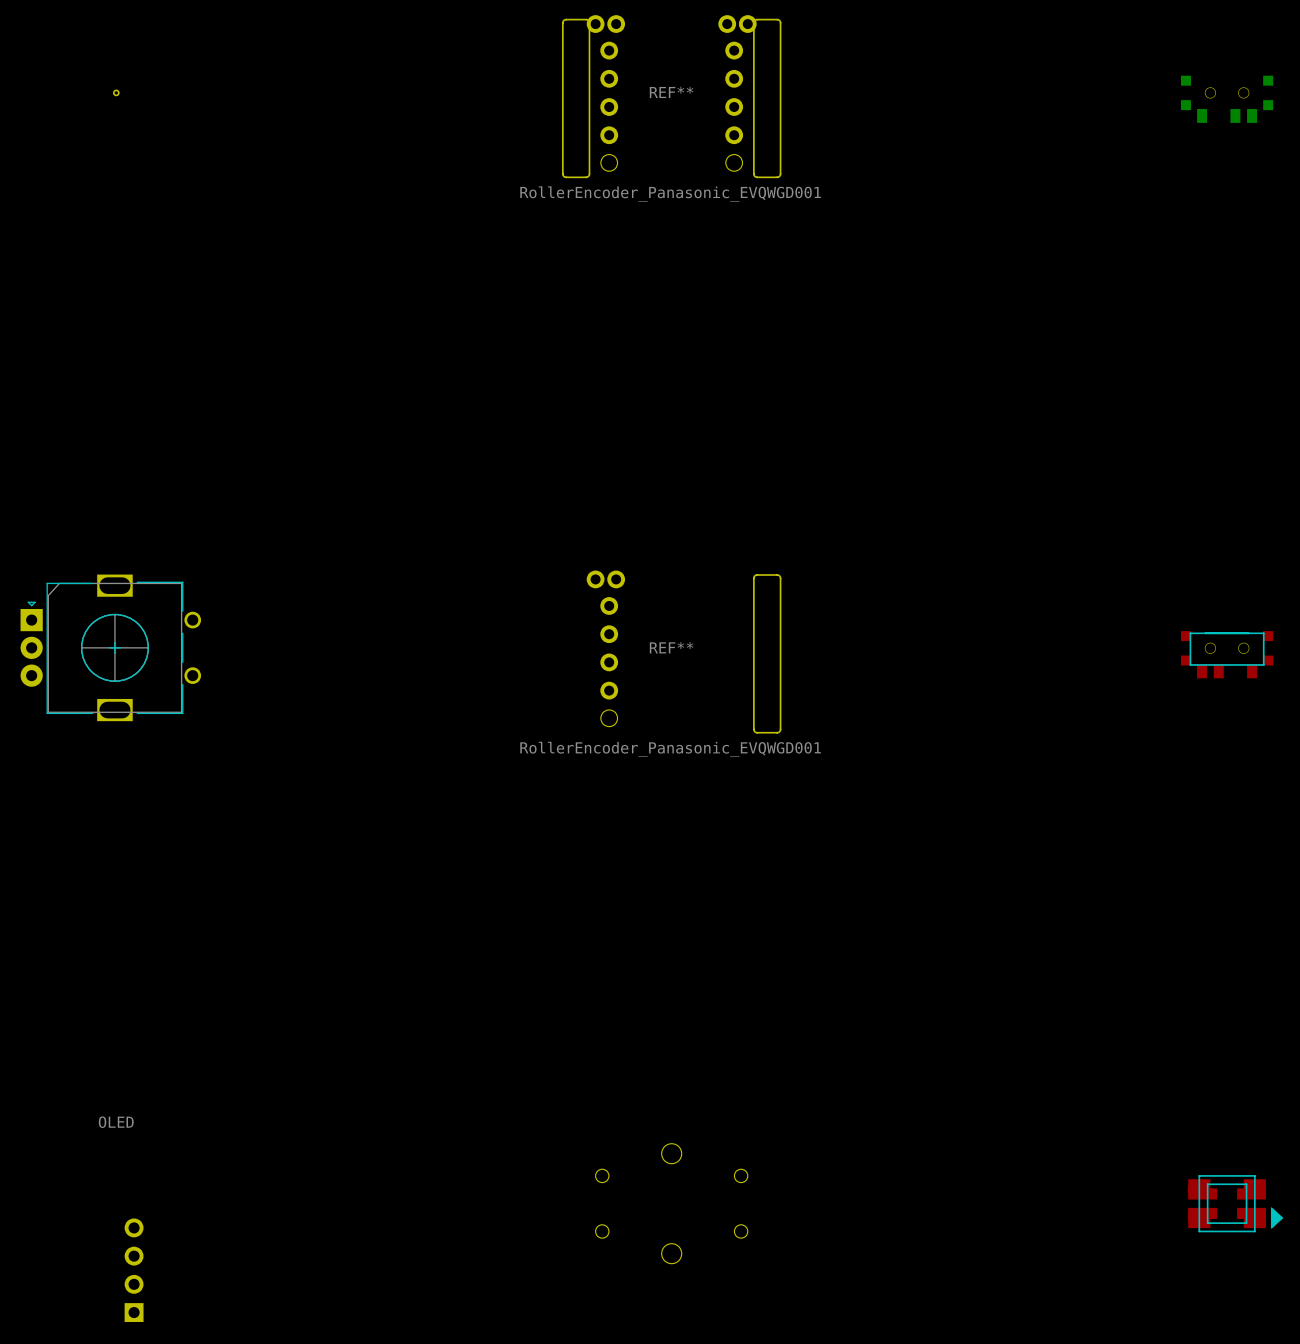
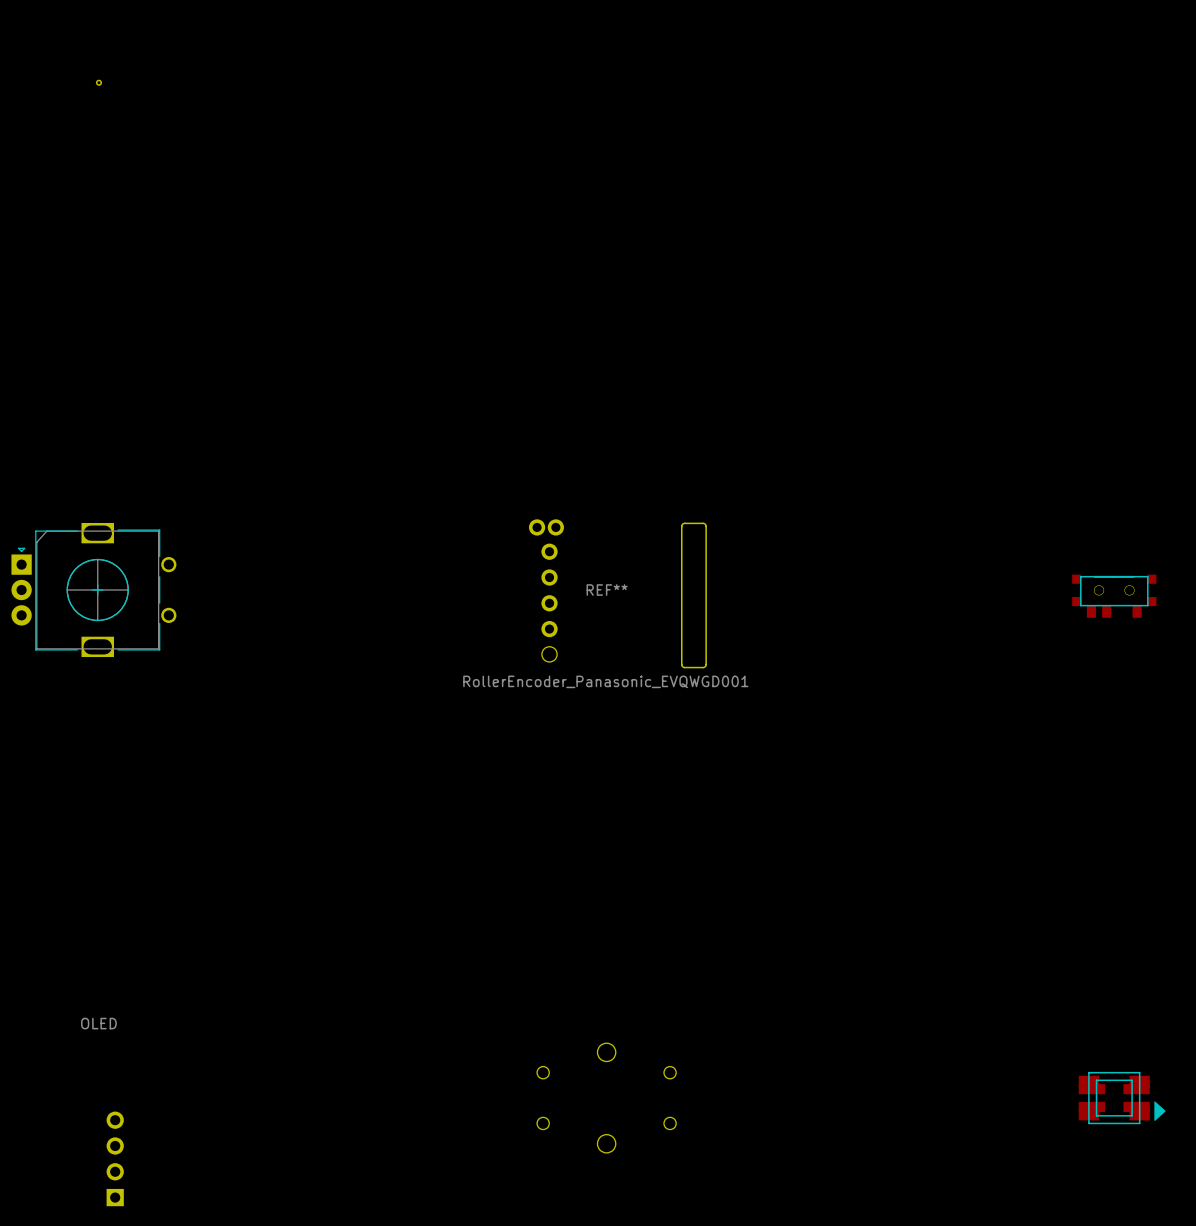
REF**: RollerEncoder_Panasonic_EVQWGD001 (671, 96) -> none
part: (1227, 99) -> none

